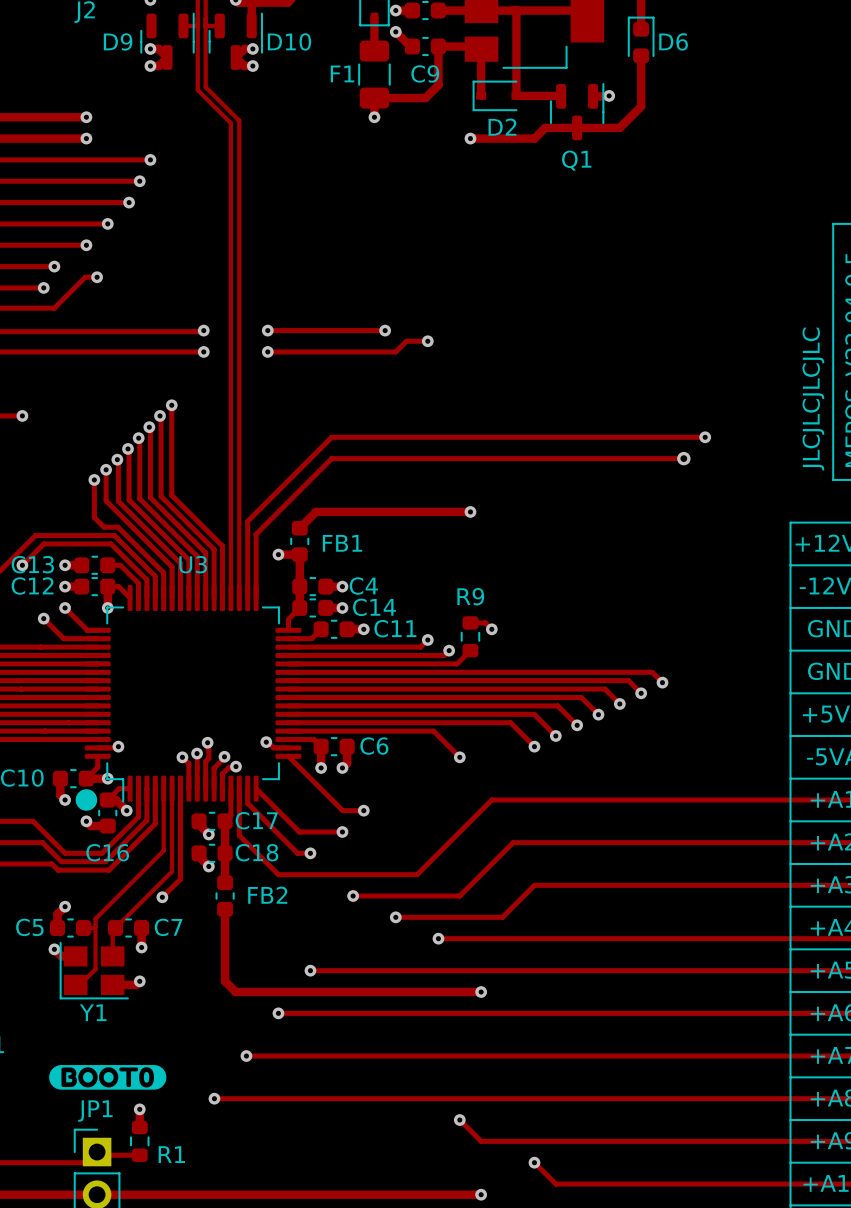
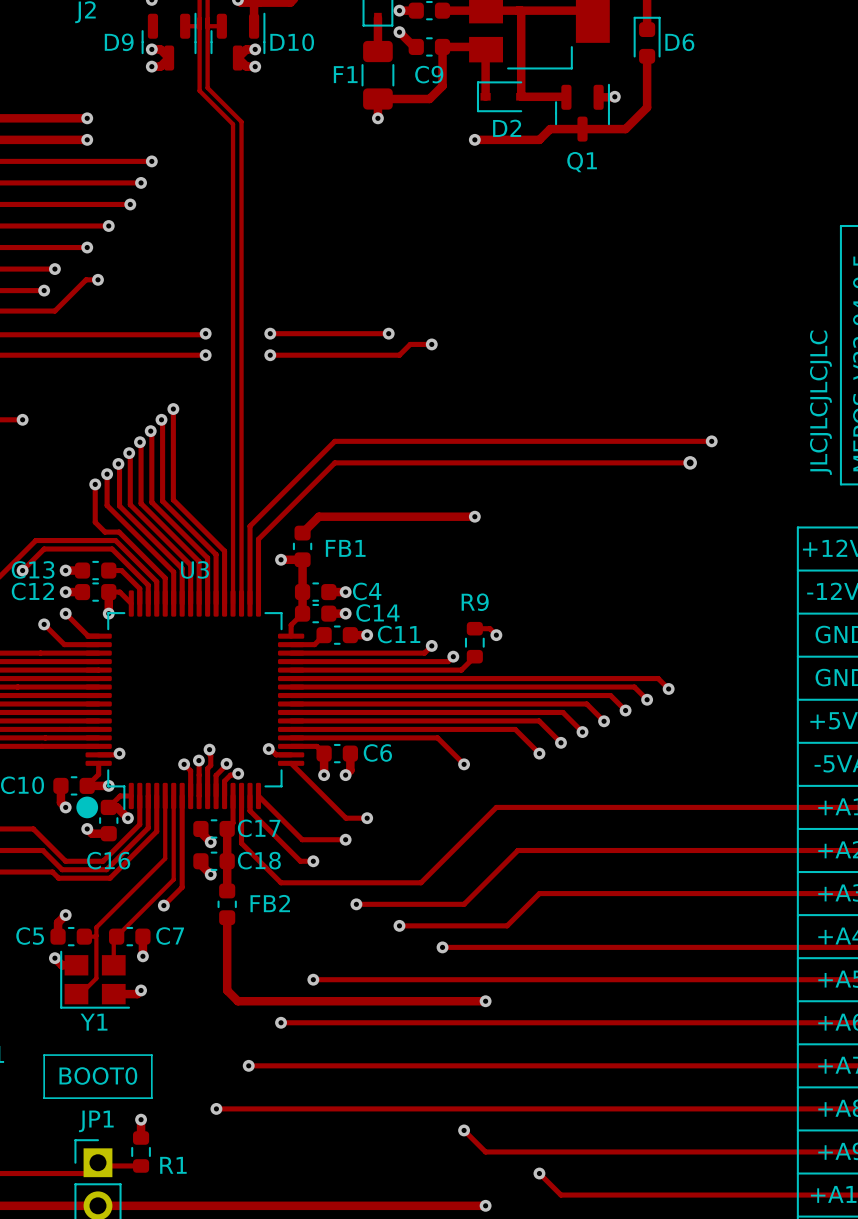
line: none -> (44, 1055) (151, 1055) (151, 1098) (44, 1098) (44, 1055)
drawing: [49, 1065, 167, 1090] -> none
text: none -> BOOT0 (98, 1075)

